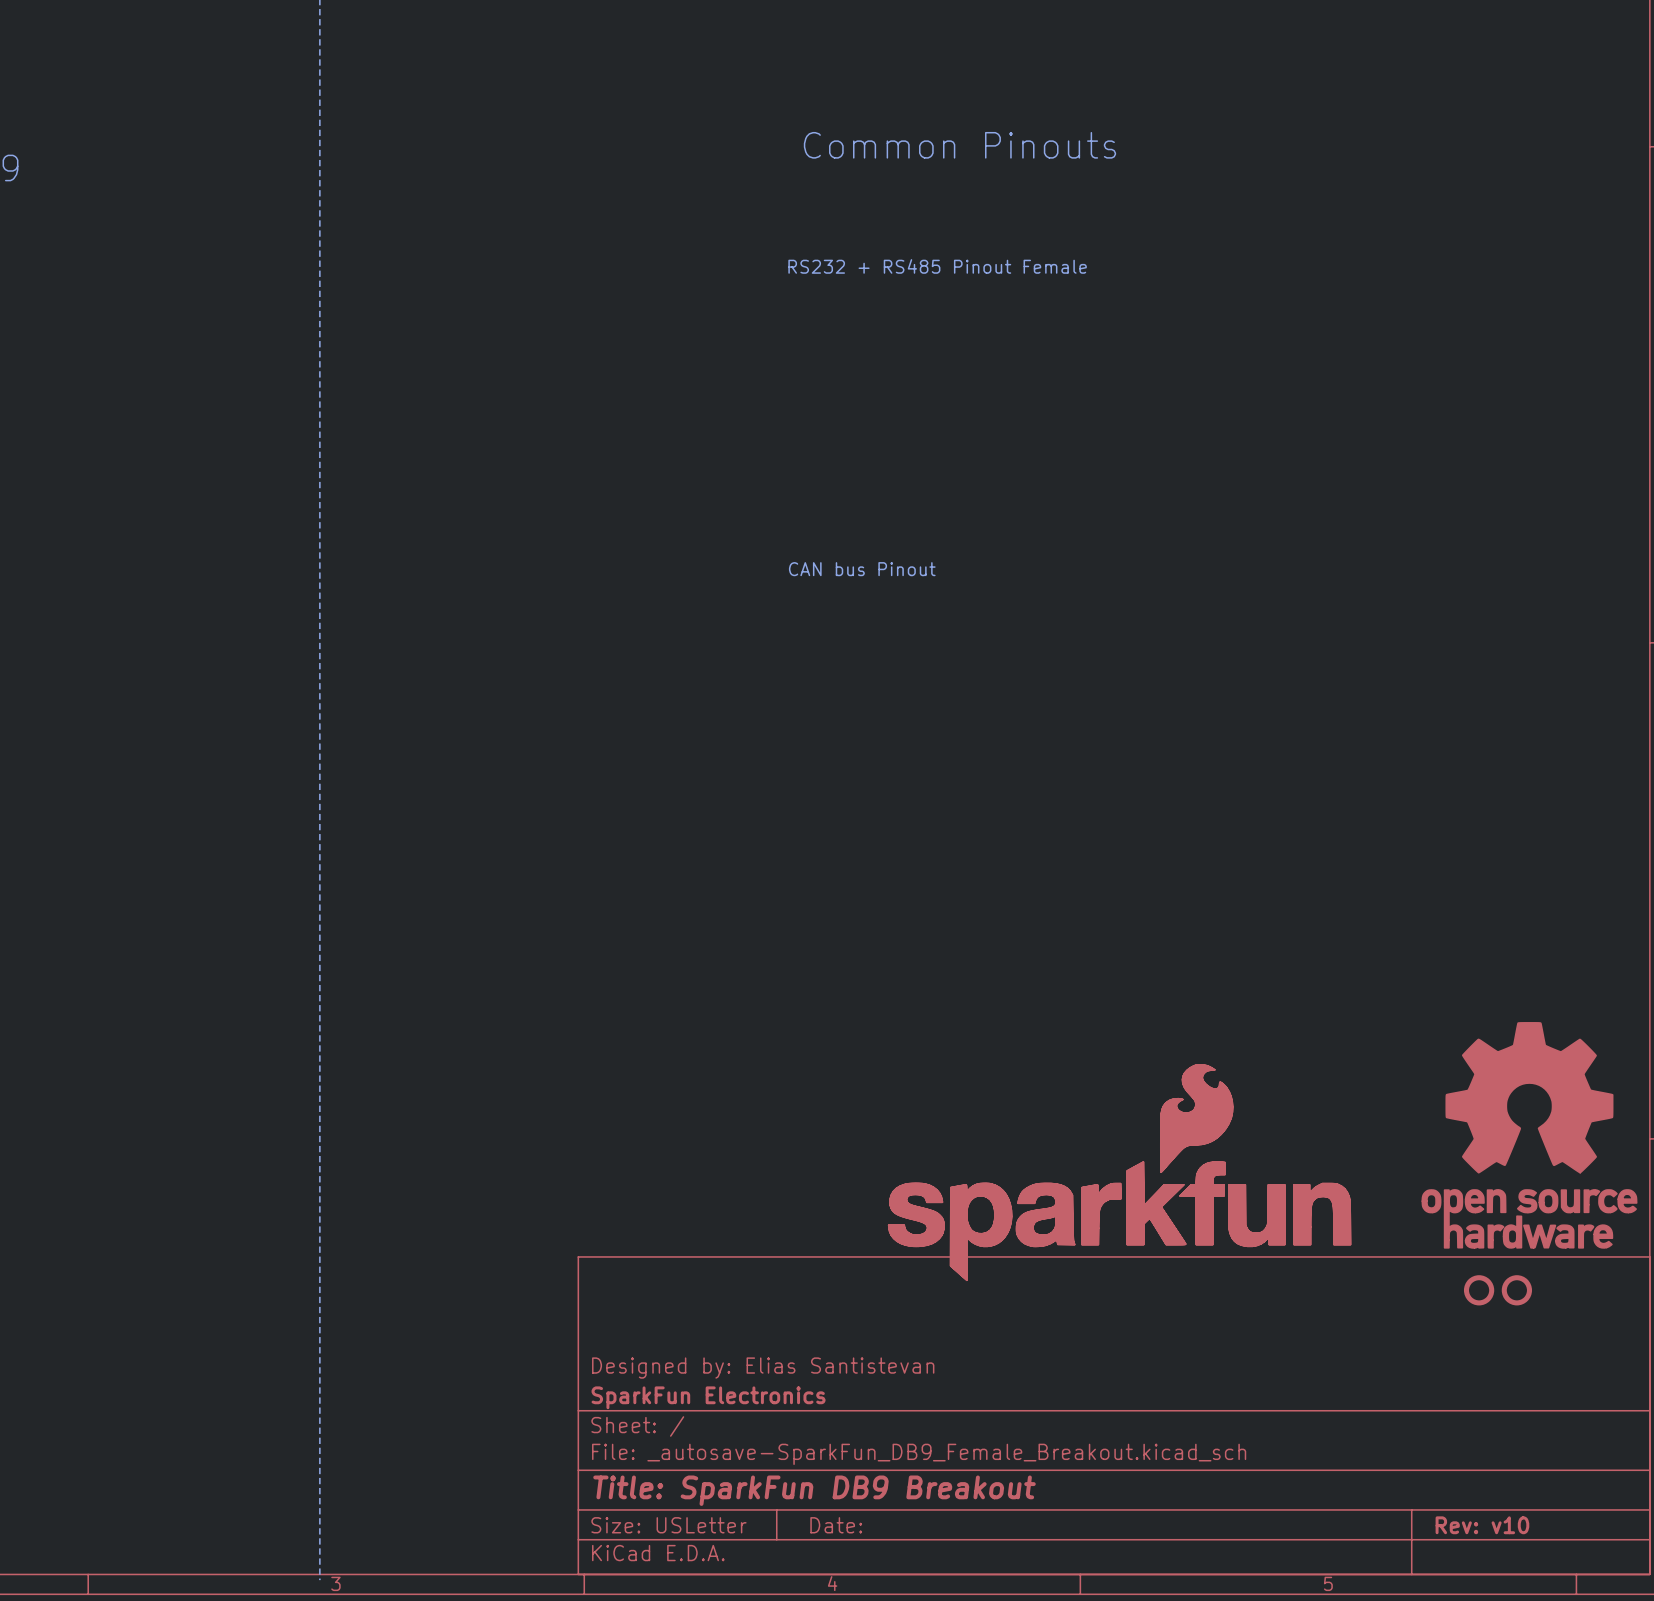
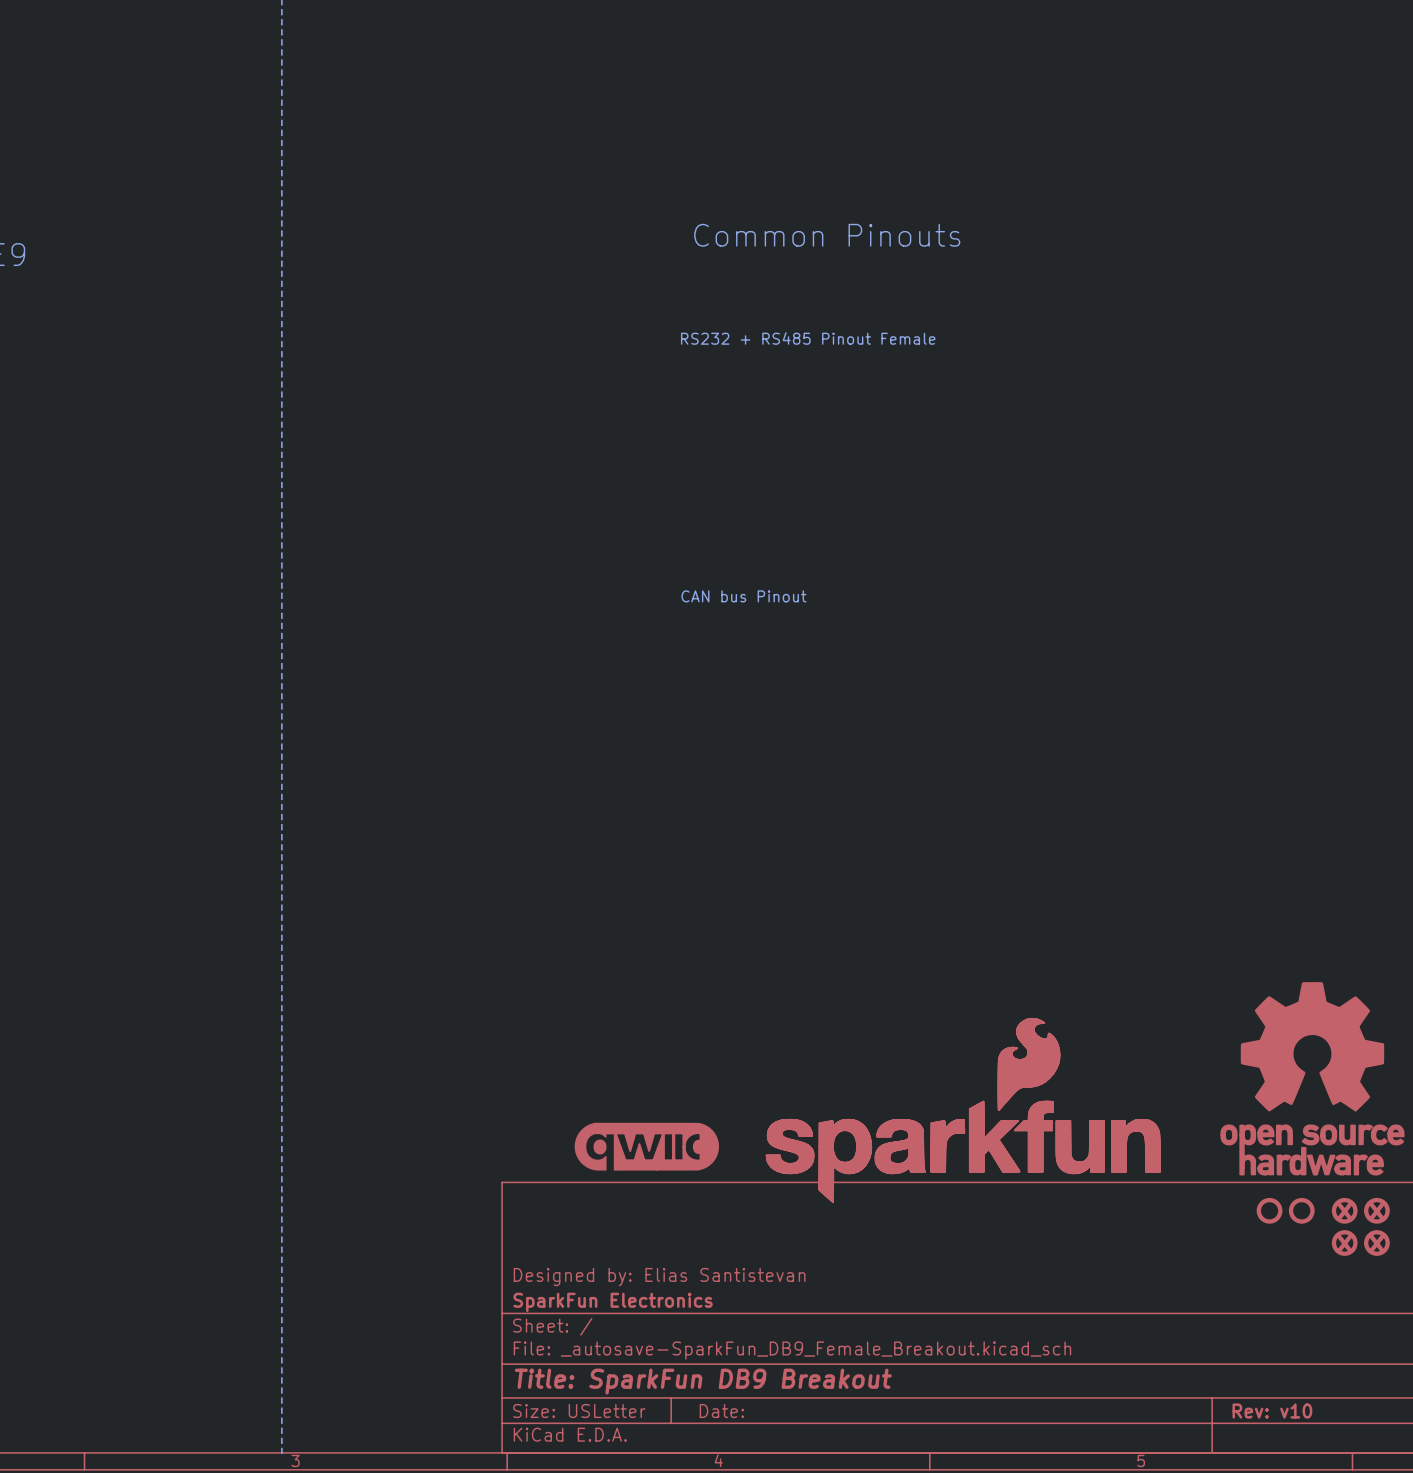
part: none -> (646, 1146)
part: none -> (1344, 1210)
part: none -> (1376, 1210)
part: none -> (1344, 1243)
part: none -> (1376, 1243)

